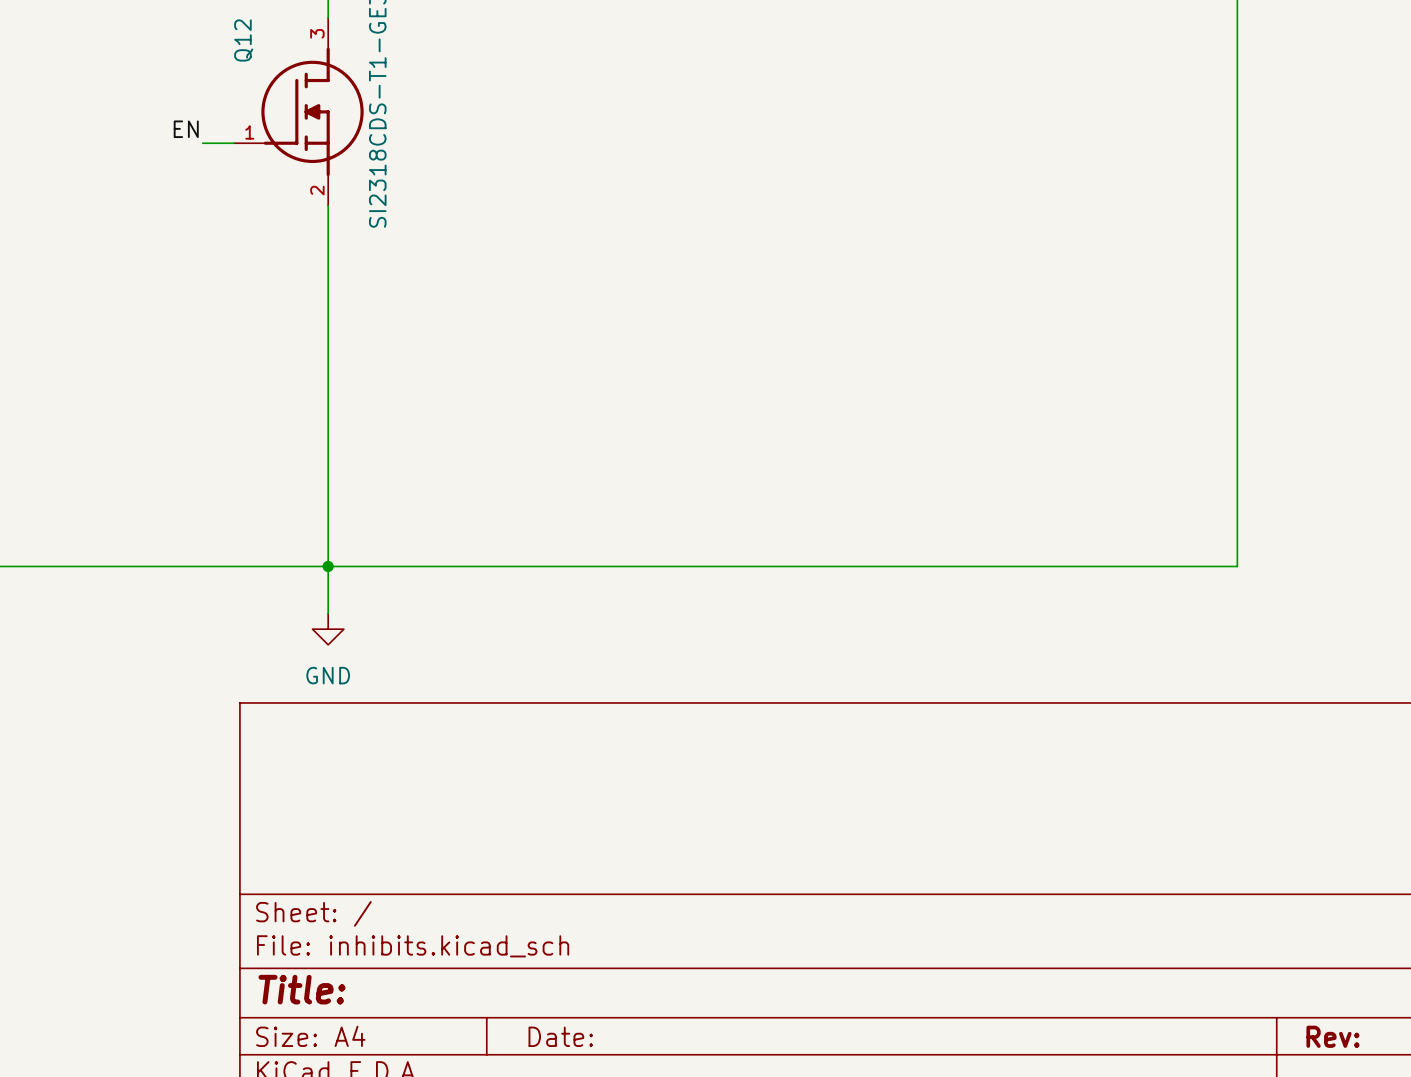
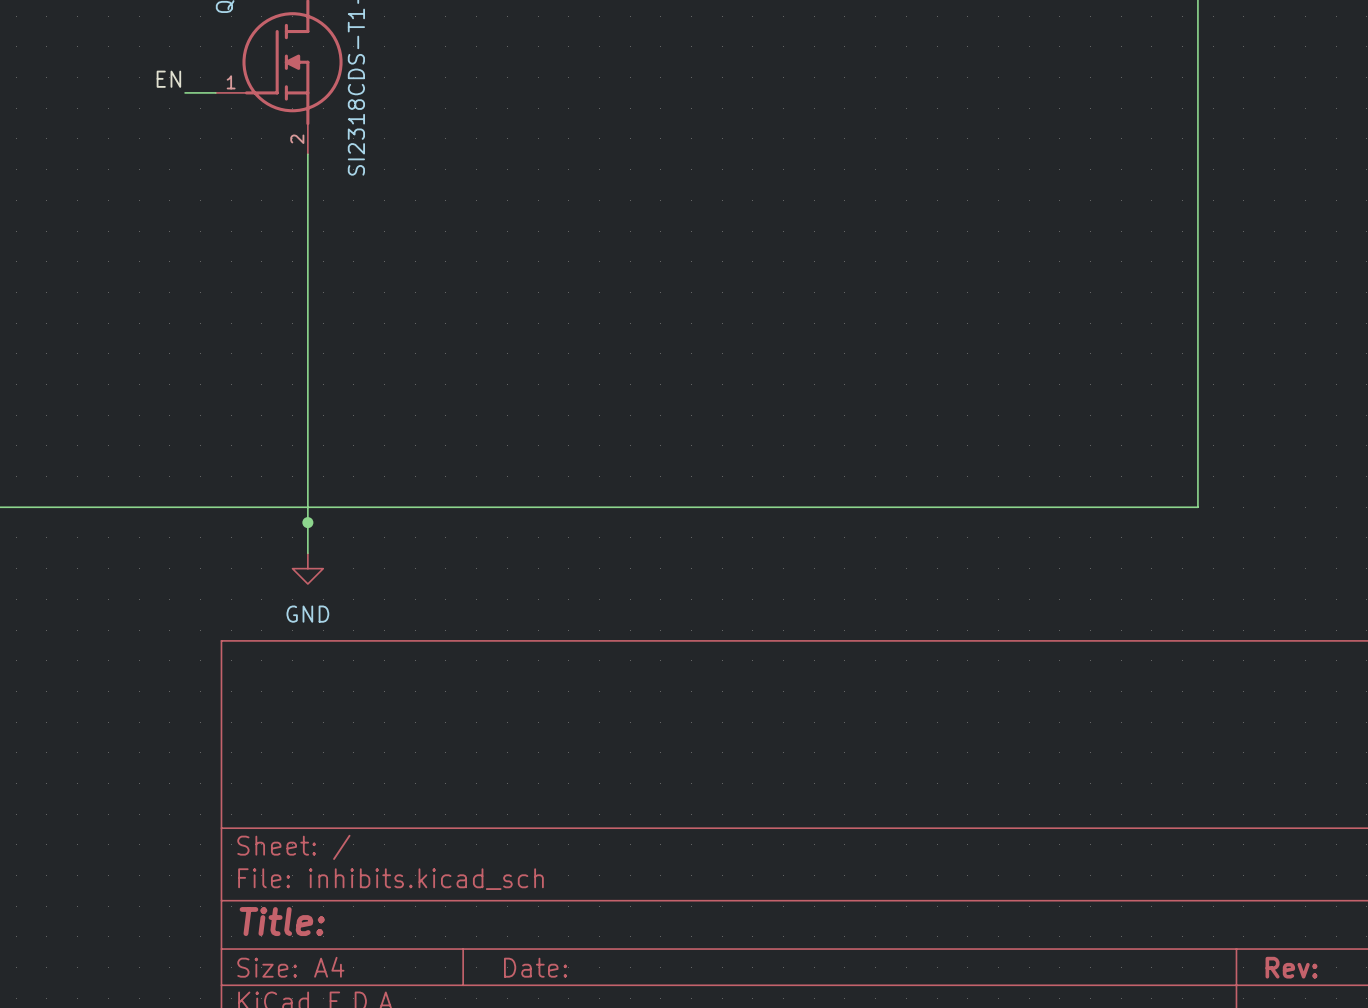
junction position: (328, 566) -> (307, 522)

